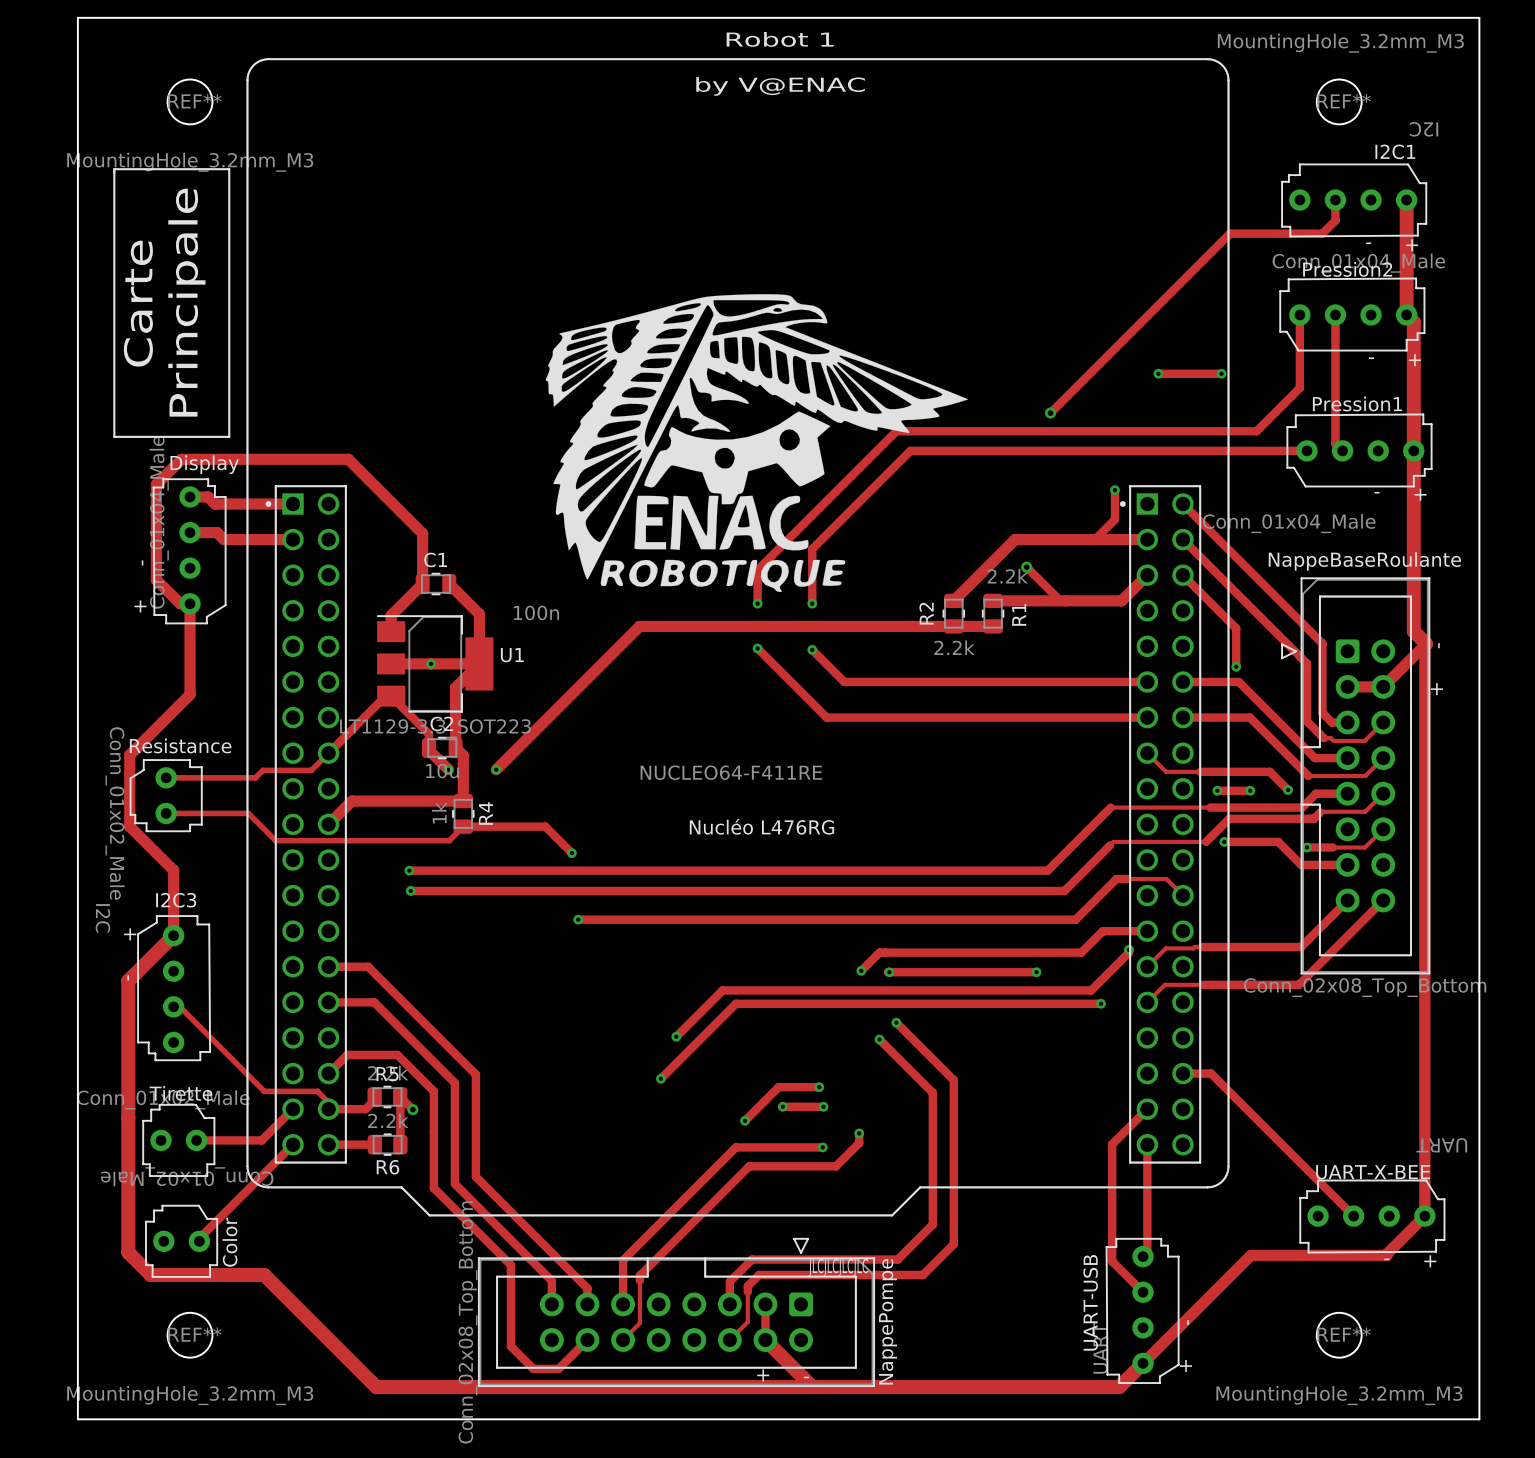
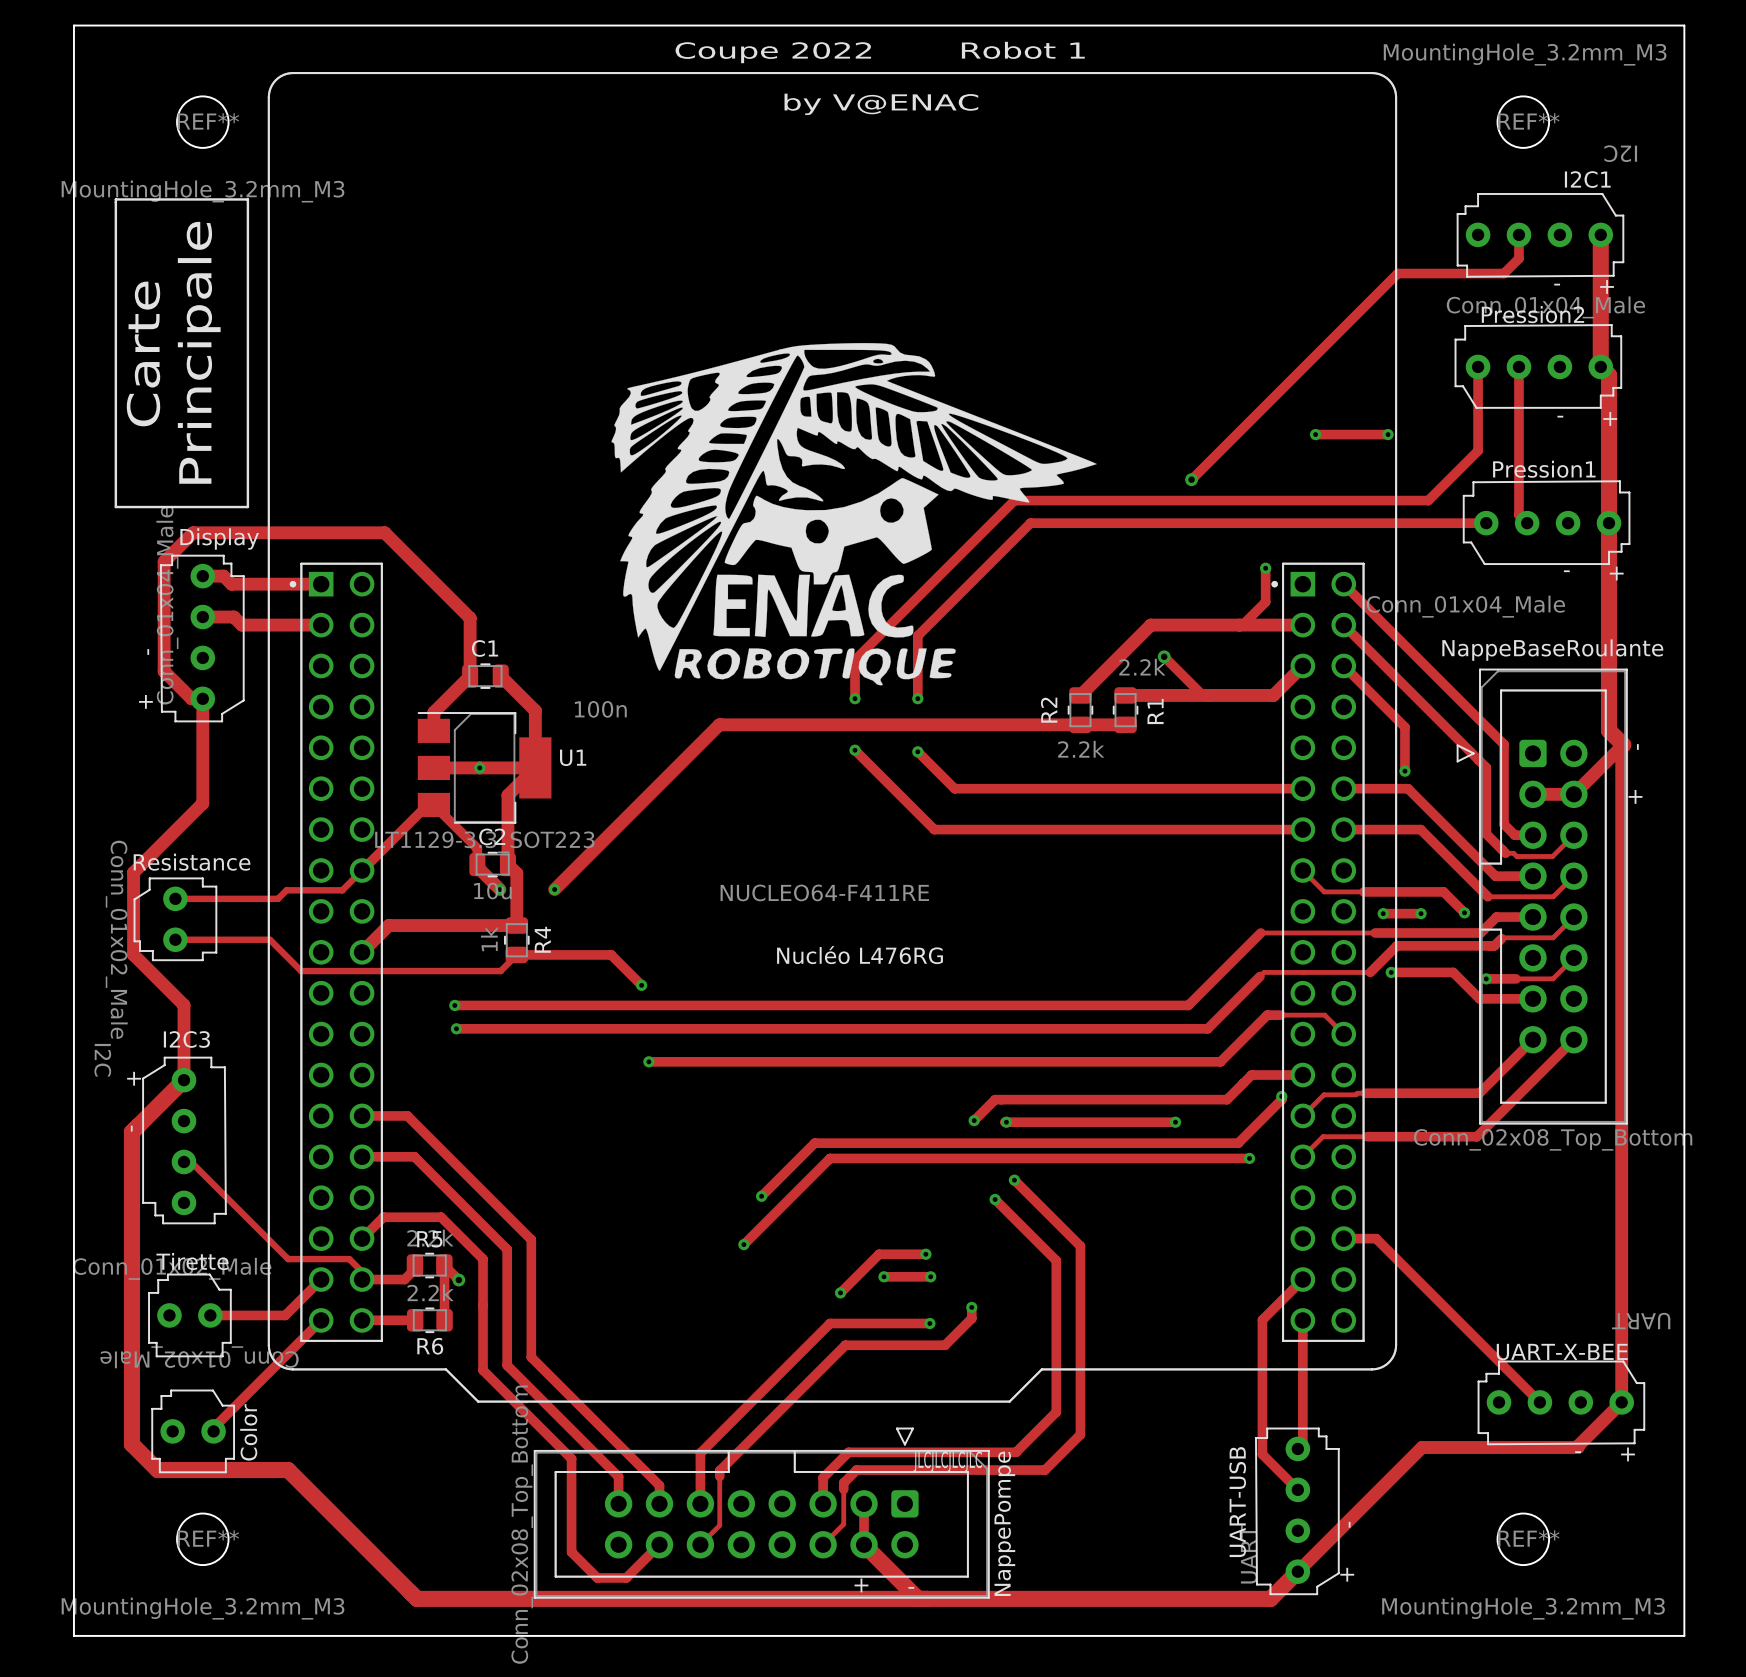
text: Robot 1 (780, 39) -> Coupe 2022 Robot 1 (880, 52)

